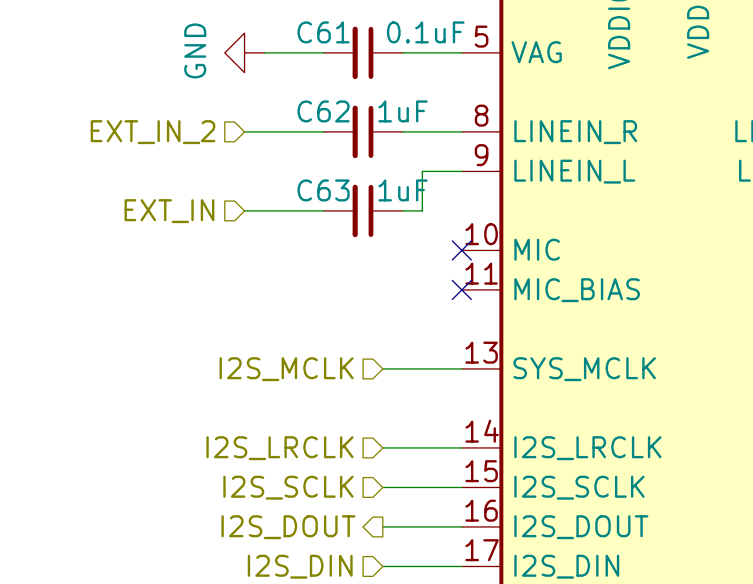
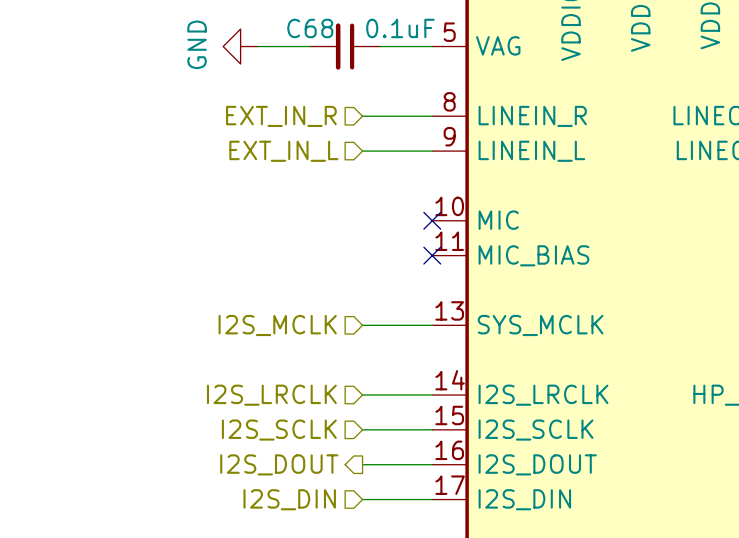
C61 name: C61 (323, 32) -> C68 (310, 28)
wire: (244, 131) (323, 131) -> none
C62: 1uF (363, 131) -> none
hierarchical label: EXT_IN_2 (153, 132) -> none
hierarchical label: none -> EXT_IN_R (281, 116)
hierarchical label: none -> EXT_IN_L (283, 151)
wire: (422, 171) (422, 210) (402, 210) -> (397, 151) (362, 151)
wire: (244, 210) (323, 210) -> none
C63: 1uF (363, 210) -> none
hierarchical label: EXT_IN (169, 211) -> none

